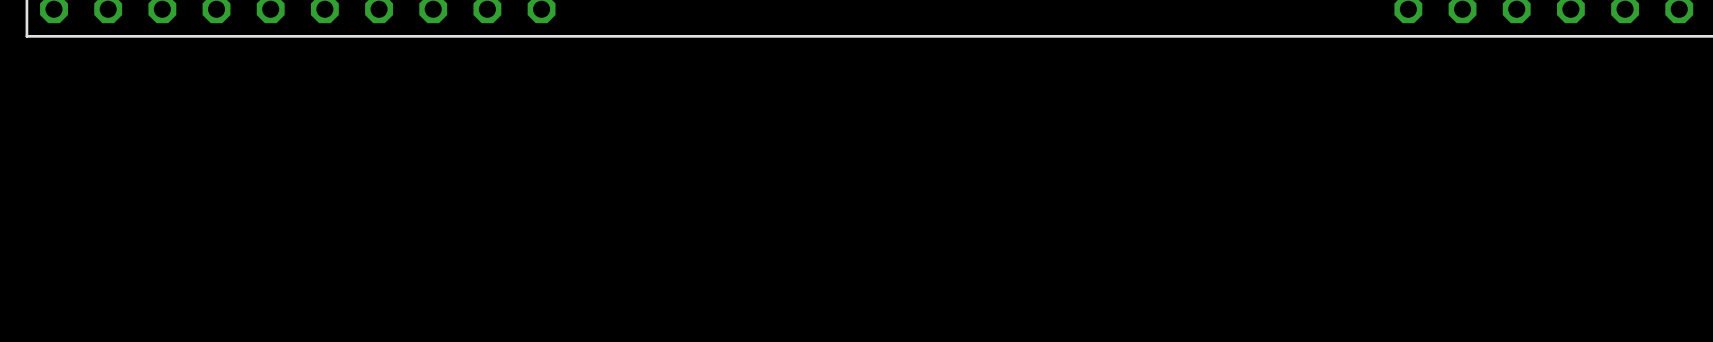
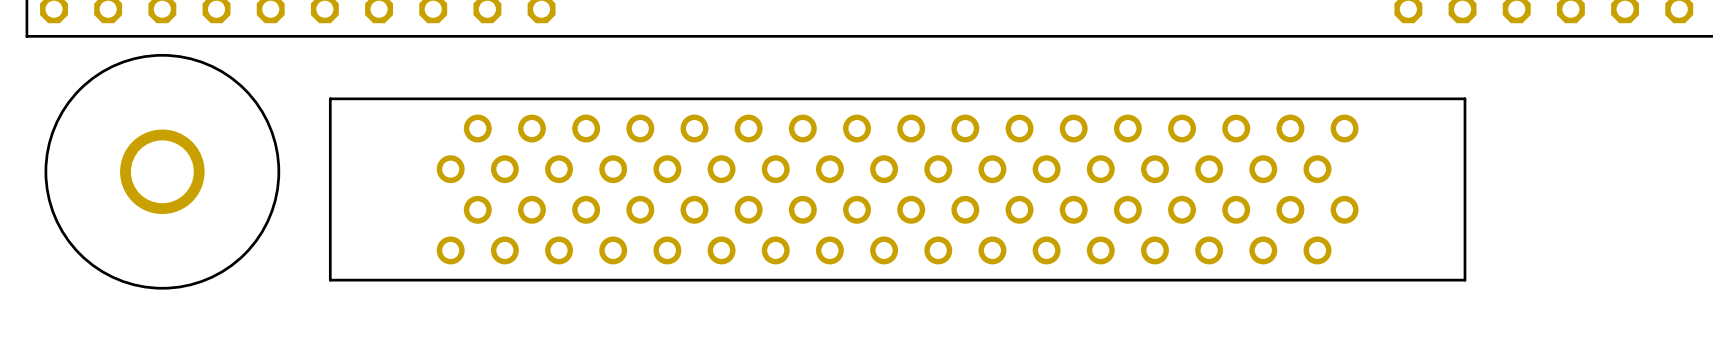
part: none -> (162, 171)
part: none -> (897, 189)

